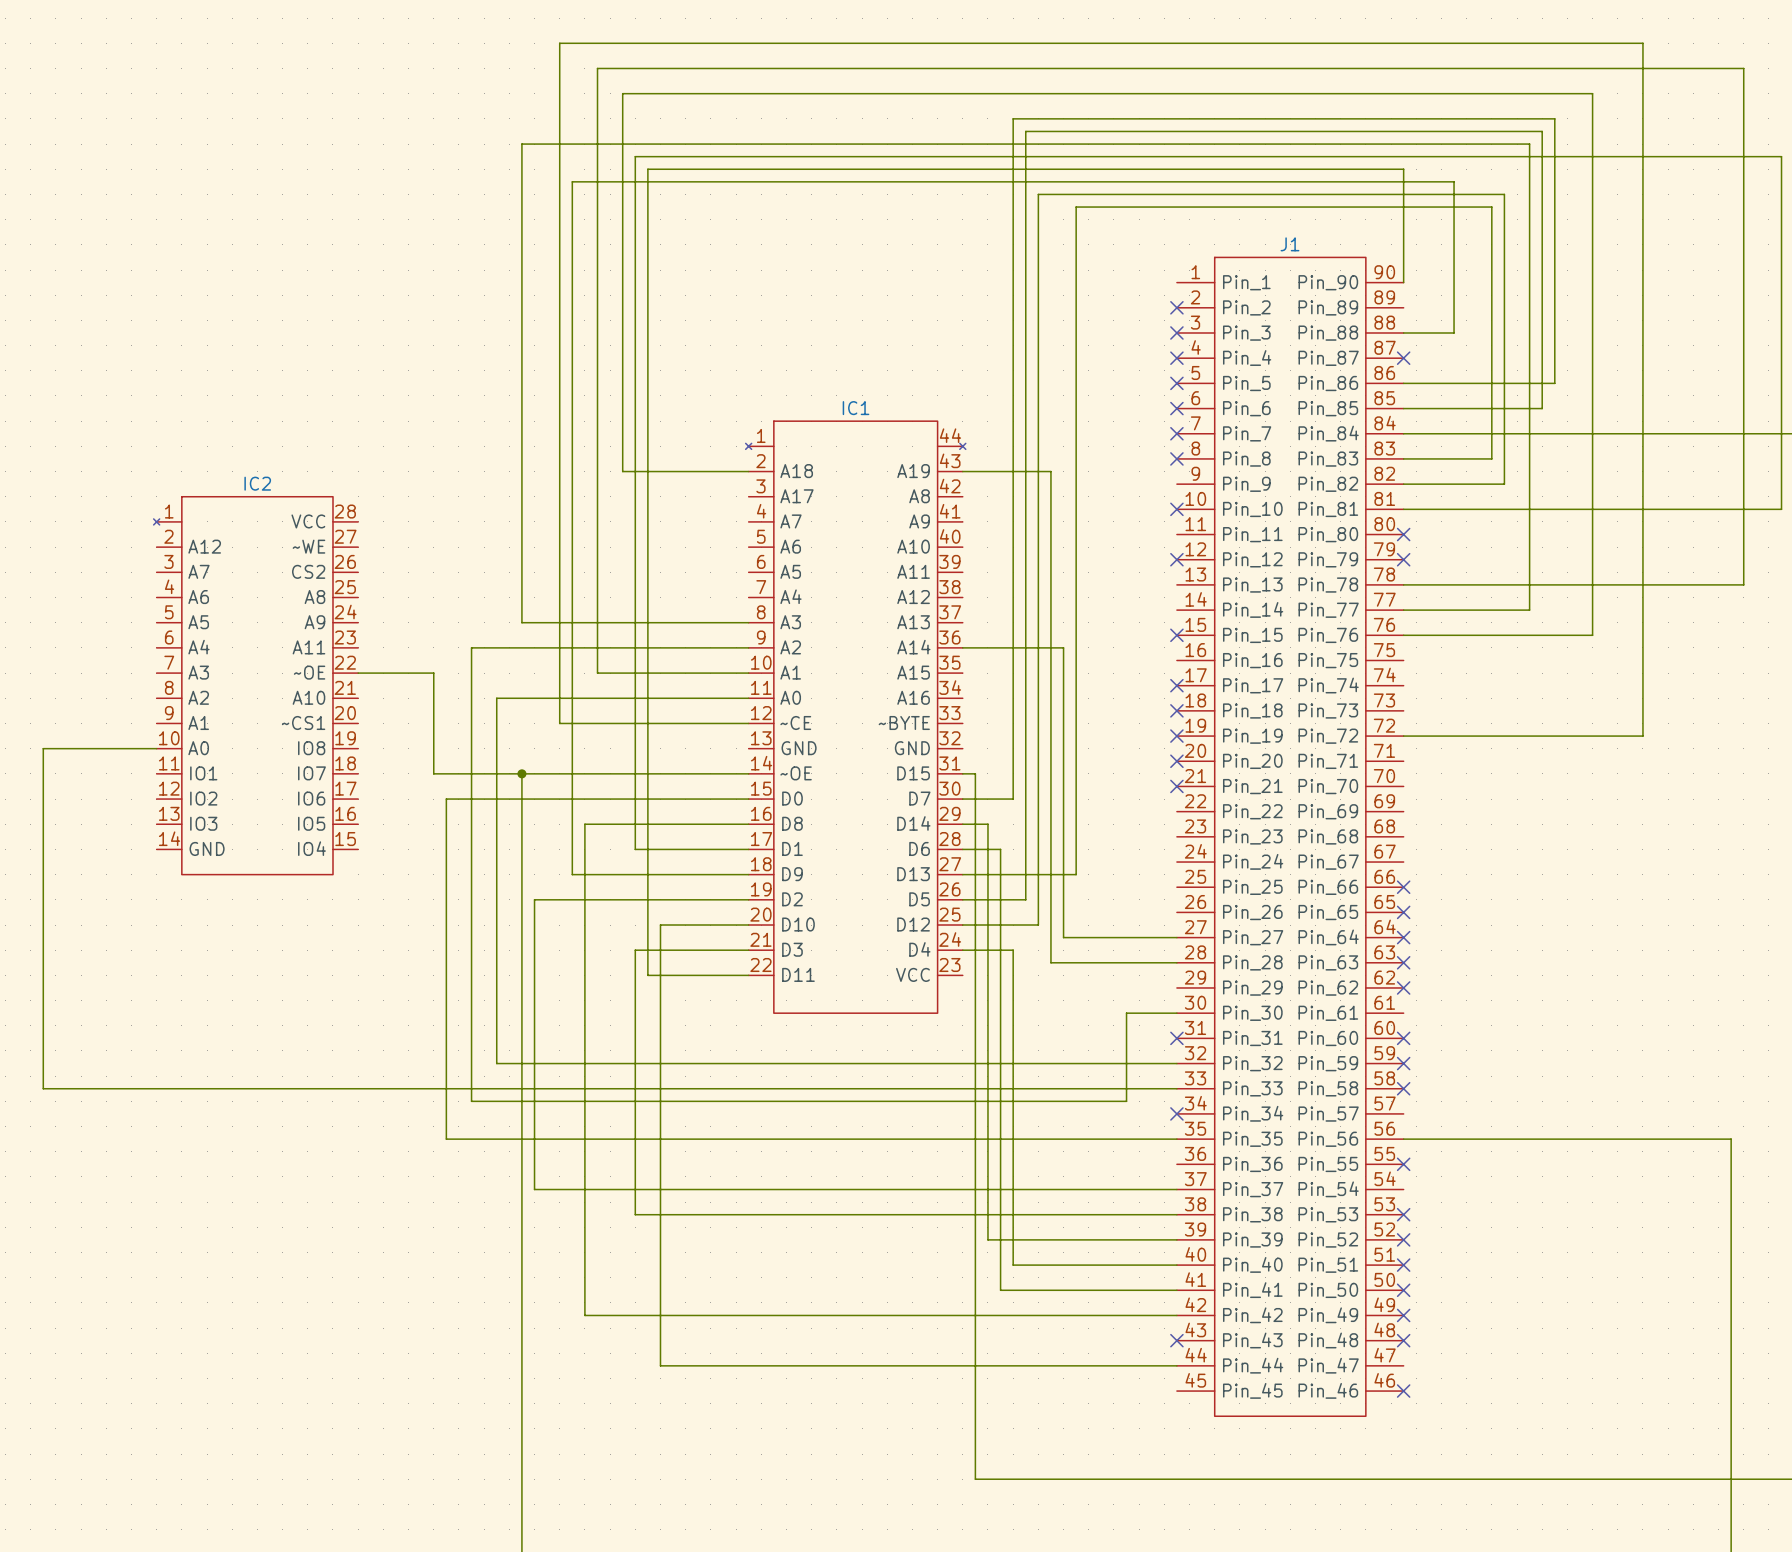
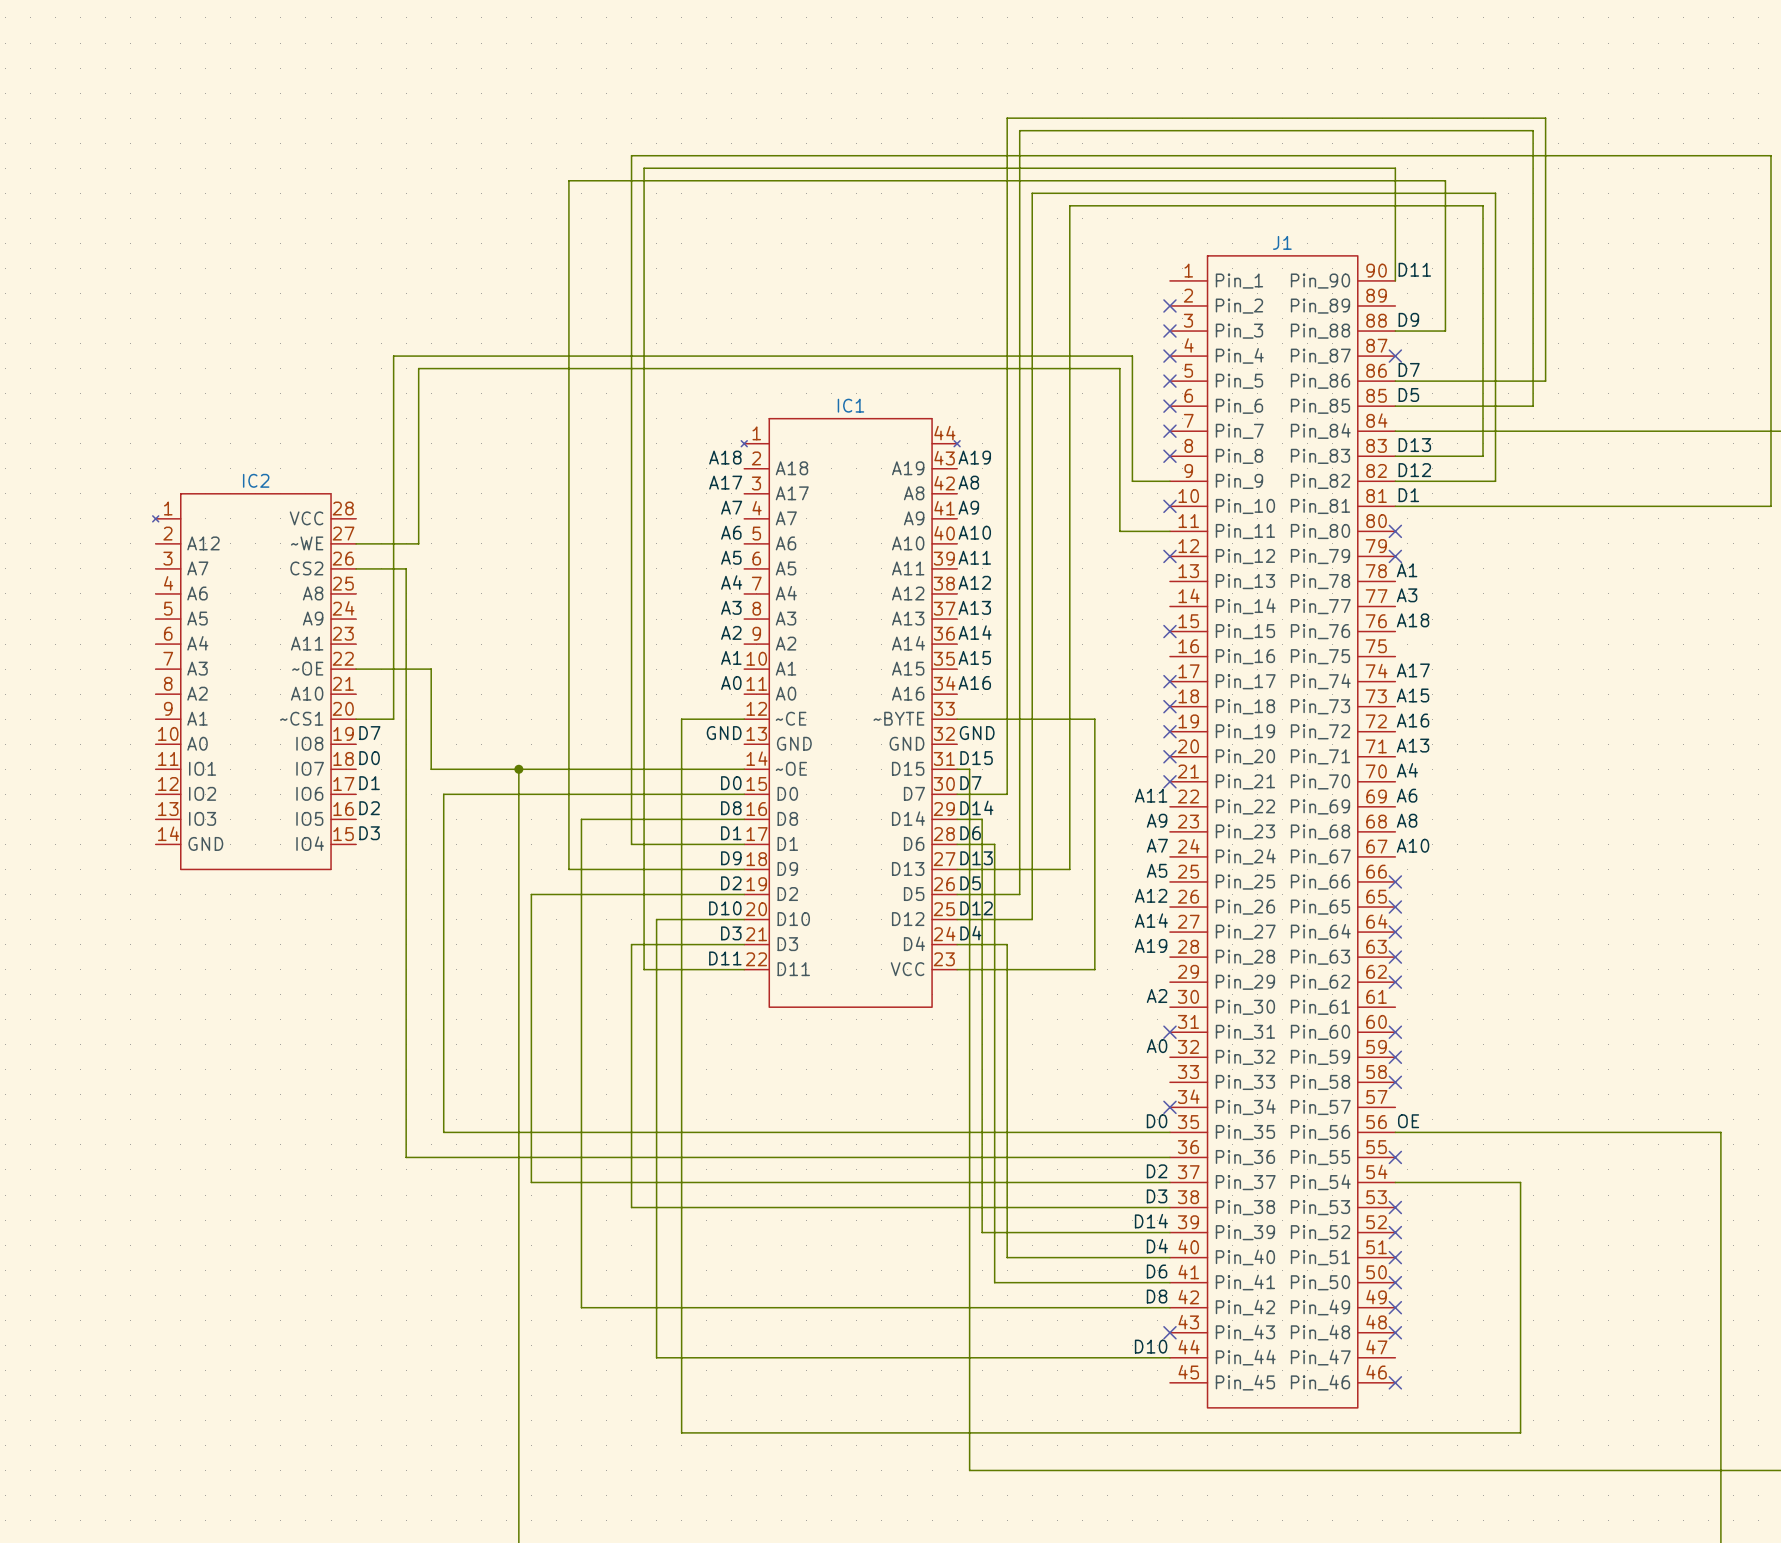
label: none -> D11 (1414, 269)
label: none -> D9 (1408, 319)
label: none -> D7 (1409, 369)
label: none -> D5 (1408, 394)
label: none -> D13 (1414, 445)
label: none -> A18 (725, 457)
label: none -> A19 (974, 457)
wire: (748, 471) (622, 471) (622, 93) (1592, 93) (1592, 635) (1403, 635) -> none
wire: (962, 471) (1050, 471) (1050, 962) (1176, 962) -> none
label: none -> D12 (1414, 470)
wire: none -> (1169, 481) (1132, 481) (1132, 356) (393, 356) (393, 719) (356, 719)
label: none -> A17 (725, 482)
label: none -> A8 (968, 482)
label: none -> D1 (1408, 495)
label: none -> A7 (731, 507)
label: none -> A9 (968, 507)
wire: none -> (1169, 531) (1119, 531) (1119, 368) (418, 368) (418, 543) (356, 543)
label: none -> A6 (731, 532)
label: none -> A10 (974, 532)
label: none -> A5 (731, 557)
label: none -> A11 (974, 557)
wire: none -> (356, 568) (406, 568) (406, 1157) (1169, 1157)
label: none -> A1 (1407, 570)
wire: (1403, 584) (1743, 584) (1743, 68) (597, 68) (597, 673) (748, 673) -> none
label: none -> A4 (731, 582)
label: none -> A12 (974, 582)
label: none -> A3 (1407, 595)
wire: (1403, 610) (1529, 610) (1529, 144) (521, 144) (521, 622) (748, 622) -> none
label: none -> A3 (731, 607)
label: none -> A13 (974, 607)
label: none -> A18 (1413, 620)
label: none -> A2 (731, 632)
label: none -> A14 (975, 632)
wire: (748, 647) (471, 647) (471, 1101) (1126, 1101) (1126, 1013) (1176, 1013) -> none
wire: (962, 647) (1063, 647) (1063, 937) (1176, 937) -> none
label: none -> A1 (731, 657)
label: none -> A15 (974, 657)
label: none -> A17 (1413, 670)
label: none -> A0 (731, 682)
label: none -> A16 (974, 682)
wire: (748, 698) (496, 698) (496, 1063) (1176, 1063) -> none
label: none -> A15 (1413, 695)
wire: (685, 723) (559, 723) (559, 43) (1642, 43) (1642, 736) (1403, 736) -> (681, 719) (681, 1432) (1520, 1432) (1520, 1182) (1395, 1182)
wire: none -> (957, 719) (1094, 719) (1094, 969) (957, 969)
label: none -> A16 (1413, 720)
label: none -> D7 (369, 733)
label: none -> GND (724, 733)
label: none -> GND (977, 733)
wire: (156, 748) (43, 748) (43, 1088) (1176, 1088) -> none
label: none -> A13 (1413, 745)
label: none -> D0 (369, 758)
label: none -> D15 (976, 758)
label: none -> A4 (1407, 770)
label: none -> D1 (369, 783)
label: none -> D0 (731, 783)
label: none -> D7 (970, 783)
label: none -> A11 (1151, 795)
label: none -> A6 (1407, 795)
label: none -> D2 (369, 808)
label: none -> D8 (731, 808)
label: none -> D14 (976, 807)
label: none -> A9 (1157, 820)
label: none -> A8 (1407, 820)
label: none -> D3 (369, 833)
label: none -> D1 (731, 833)
label: none -> D6 (970, 833)
label: none -> A7 (1157, 845)
label: none -> A10 (1413, 845)
label: none -> D9 (731, 858)
label: none -> D13 (976, 858)
label: none -> A5 (1157, 870)
label: none -> D2 (731, 883)
label: none -> D5 (970, 883)
label: none -> A12 (1151, 895)
label: none -> D10 (725, 908)
label: none -> D12 (976, 908)
label: none -> A14 (1151, 920)
label: none -> D3 (731, 933)
label: none -> D4 (970, 933)
label: none -> A19 (1151, 945)
label: none -> D11 (725, 958)
label: none -> A2 (1157, 996)
label: none -> A0 (1157, 1046)
label: none -> D0 (1157, 1121)
label: none -> OE (1408, 1121)
label: none -> D2 (1157, 1171)
label: none -> D3 (1157, 1196)
label: none -> D14 (1151, 1221)
label: none -> D4 (1157, 1246)
label: none -> D6 (1157, 1271)
label: none -> D8 (1157, 1296)
label: none -> D10 (1151, 1346)

